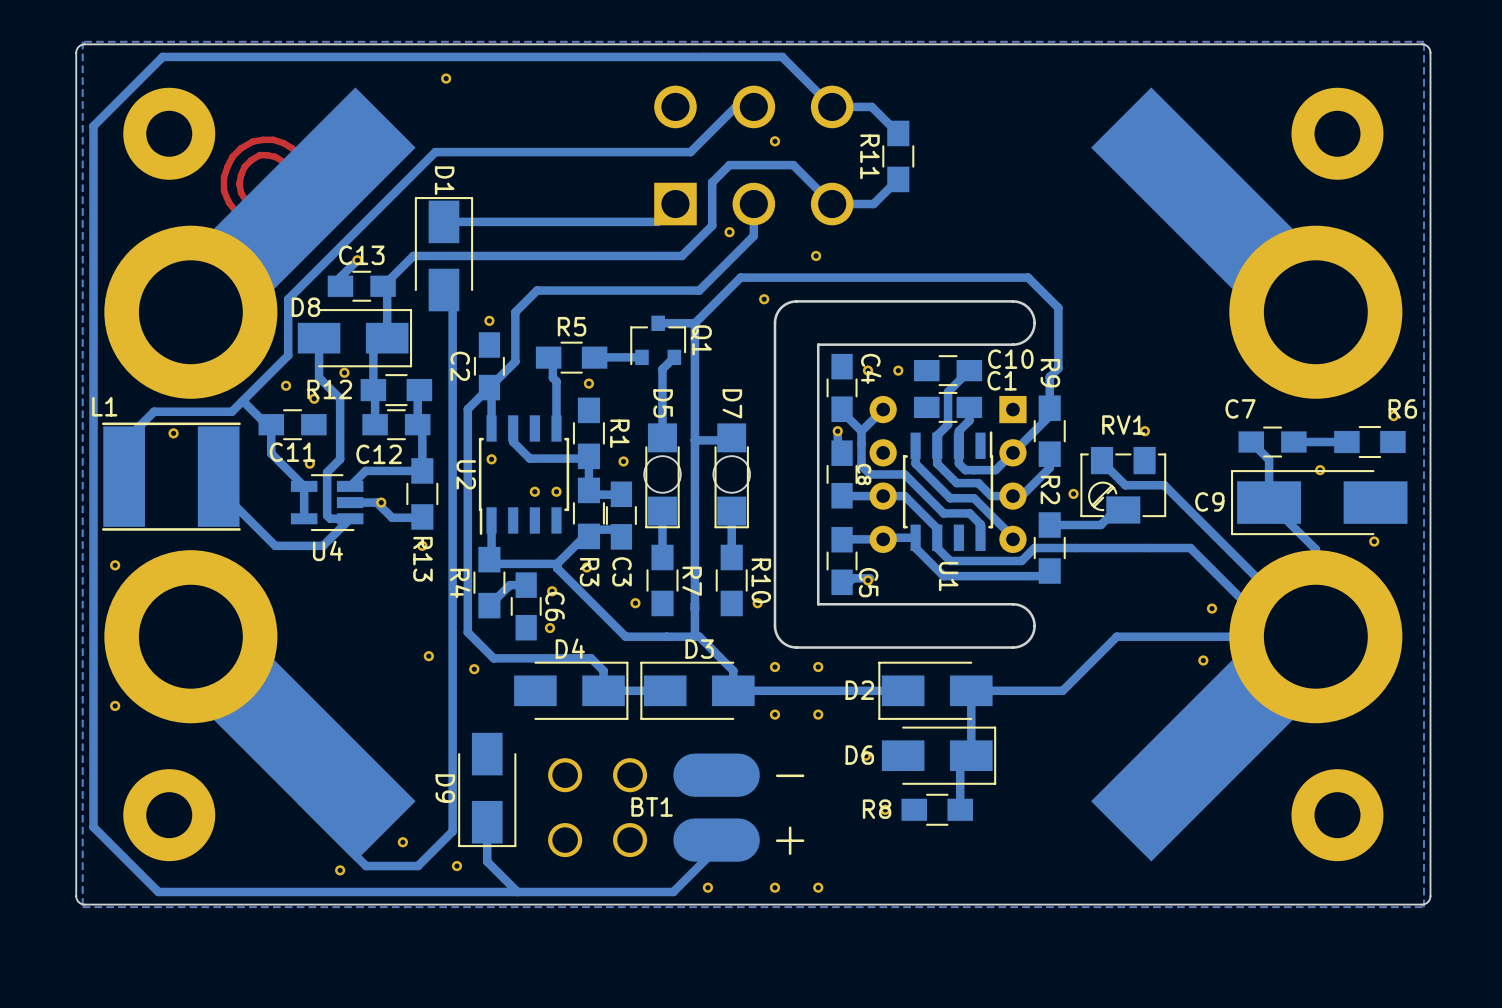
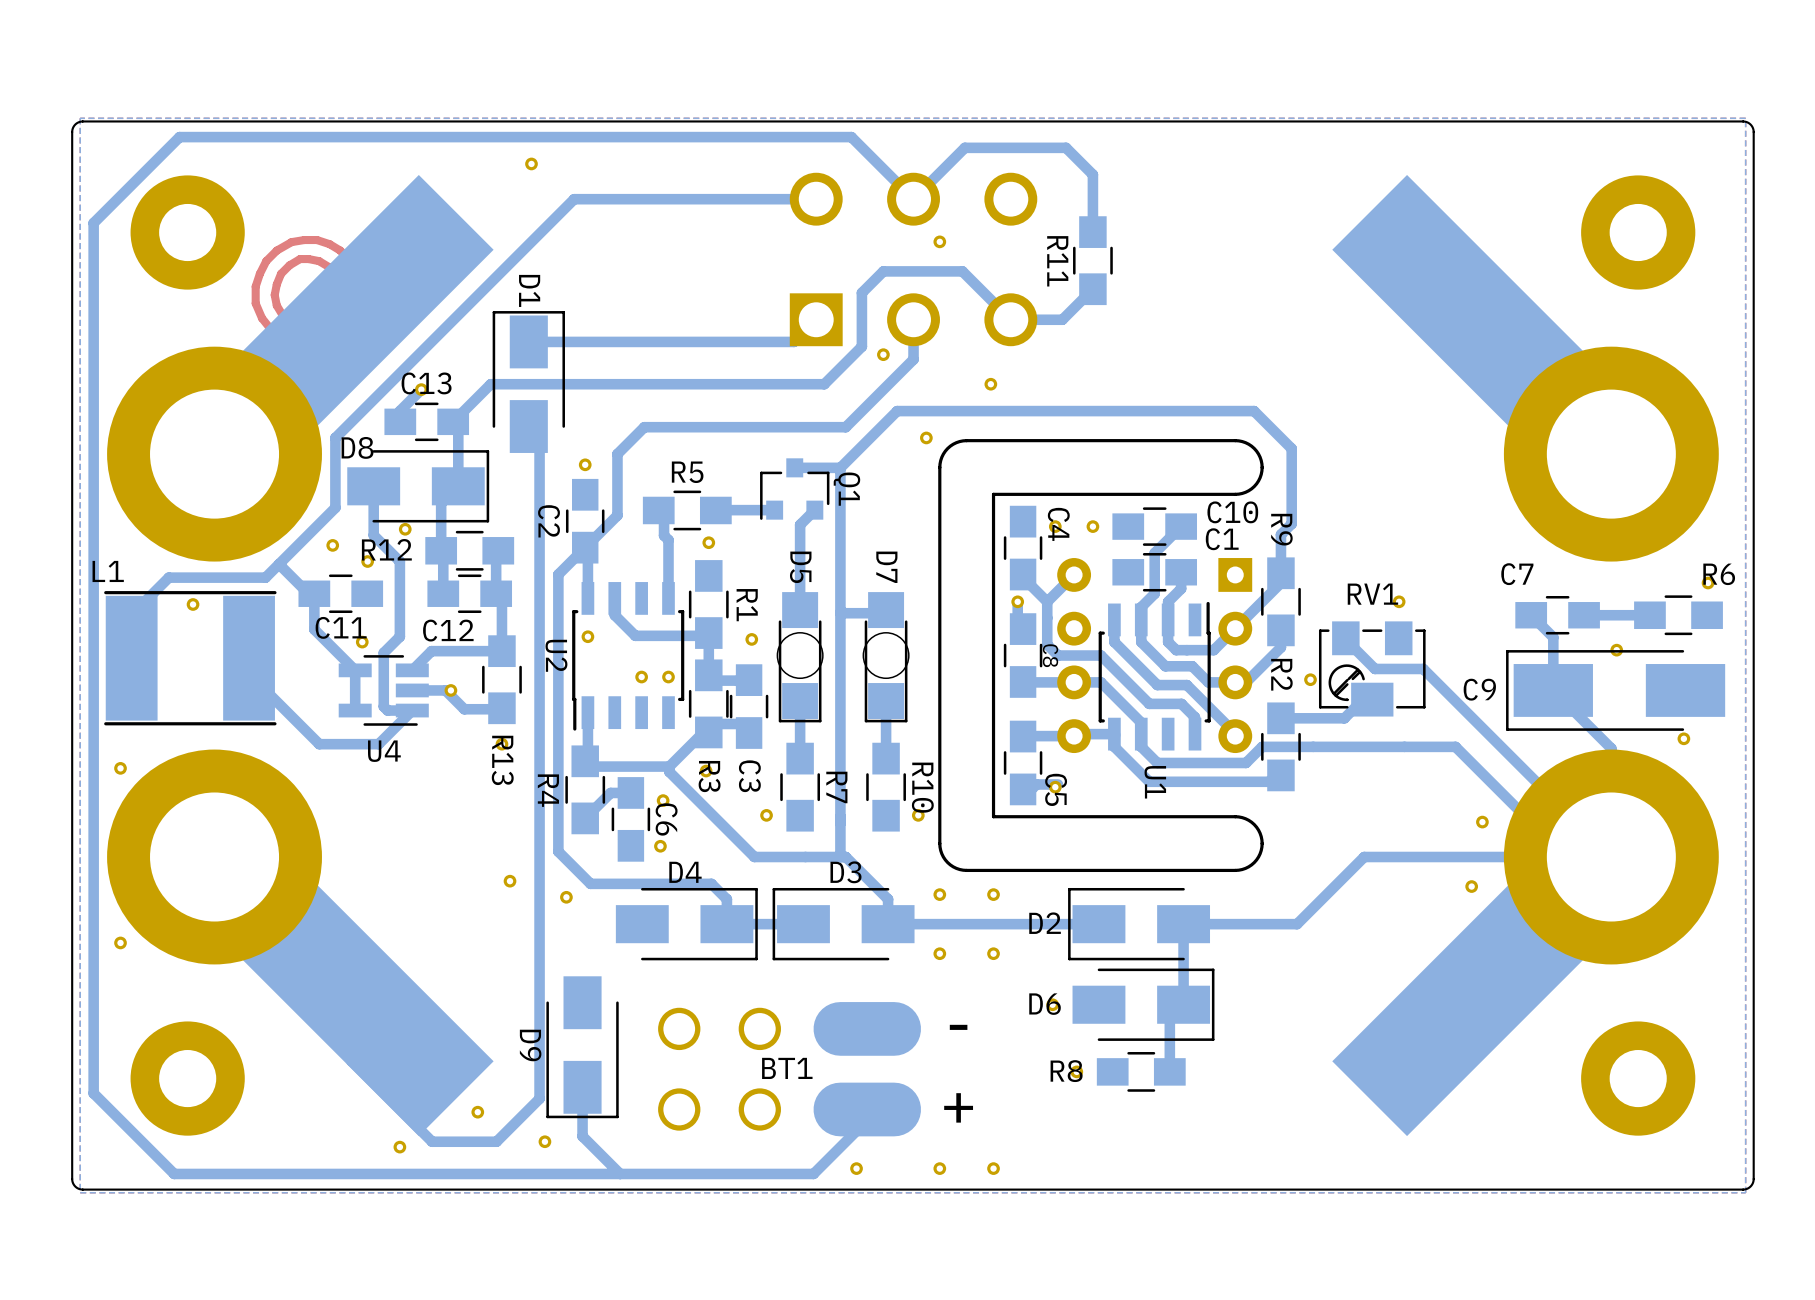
bottom track: (703, 56) (782, 56) (832, 106) (871, 106) (898, 133) -> (851, 137) (913, 199) (964, 147) (1066, 147) (1092, 174) (1092, 232)
bottom track: (753, 106) (735, 106) (690, 152) (435, 152) -> (816, 199) (574, 199) (518, 255)

